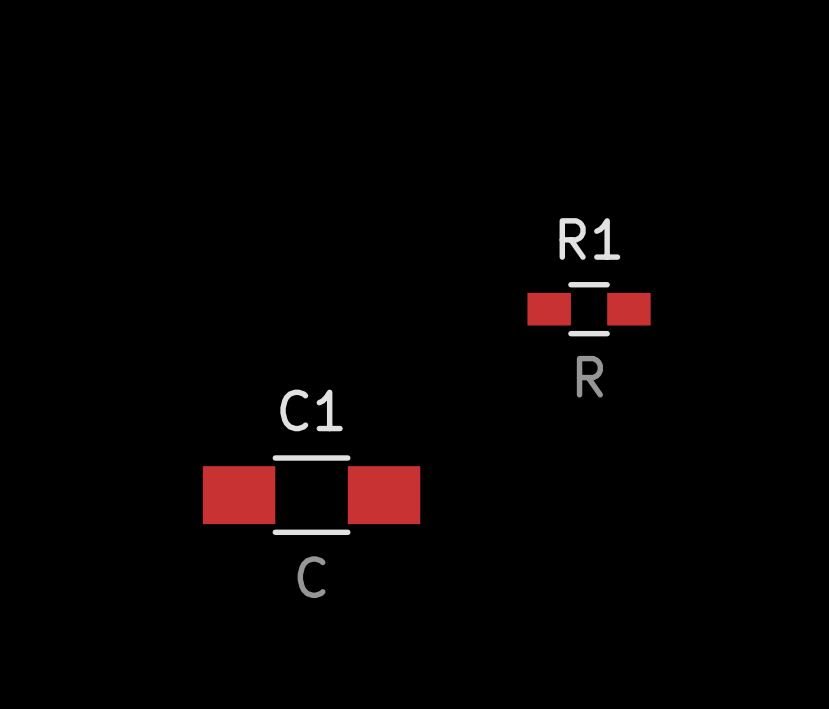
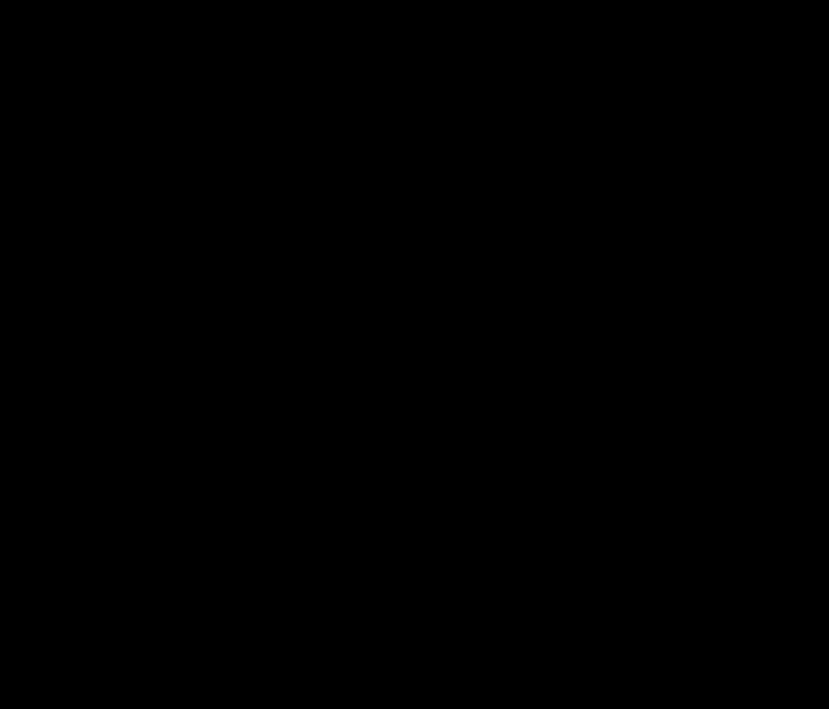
R1: R (589, 309) -> none
C1: C (311, 495) -> none

